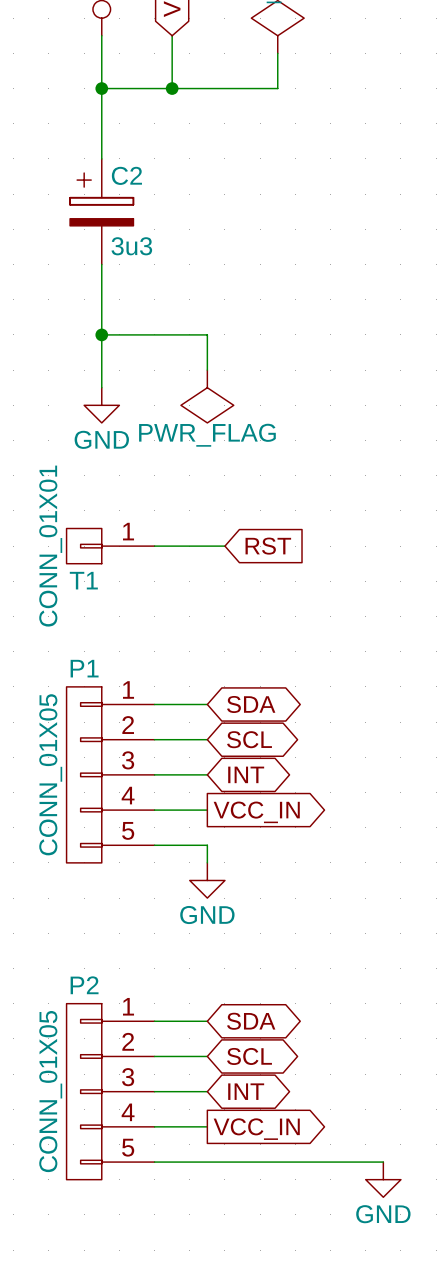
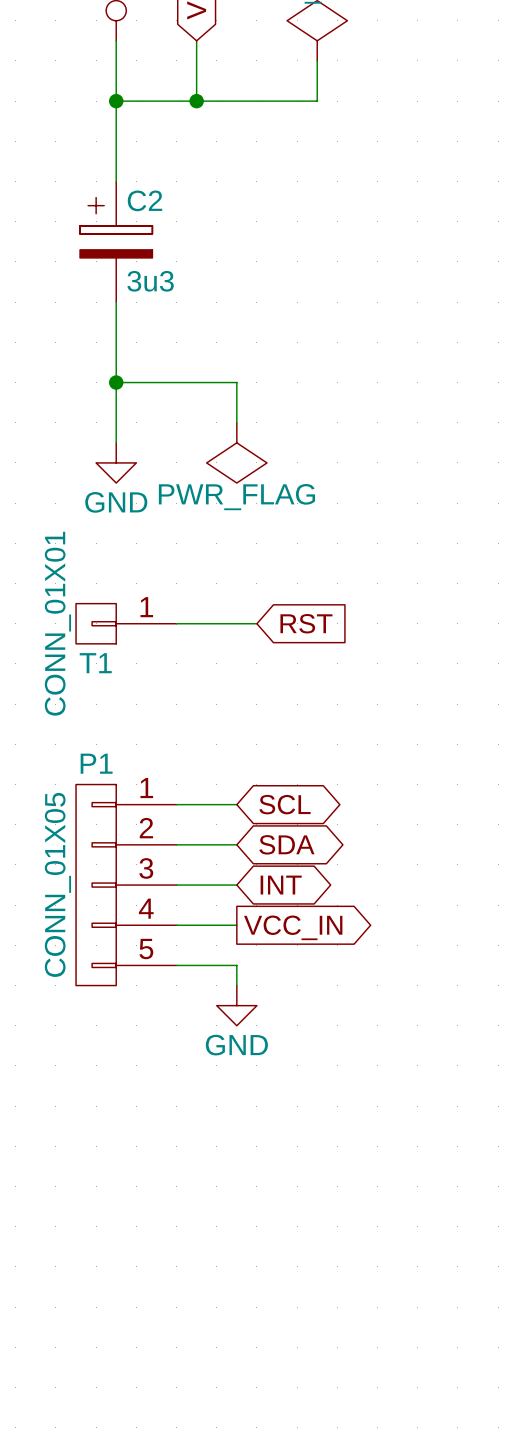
global label: SDA (251, 704) -> SCL (284, 804)
global label: SCL (249, 739) -> SDA (286, 844)
wire: (154, 1021) (207, 1021) -> none
global label: SDA (251, 1021) -> none
wire: (154, 1056) (207, 1056) -> none
global label: SCL (249, 1056) -> none
P2: CONN_01X05 (110, 1091) -> none
wire: (154, 1091) (207, 1091) -> none
global label: INT (246, 1091) -> none
wire: (154, 1126) (207, 1126) -> none
global label: VCC_IN (256, 1129) -> none
wire: (154, 1162) (383, 1162) -> none
power symbol: GND (383, 1179) -> none

